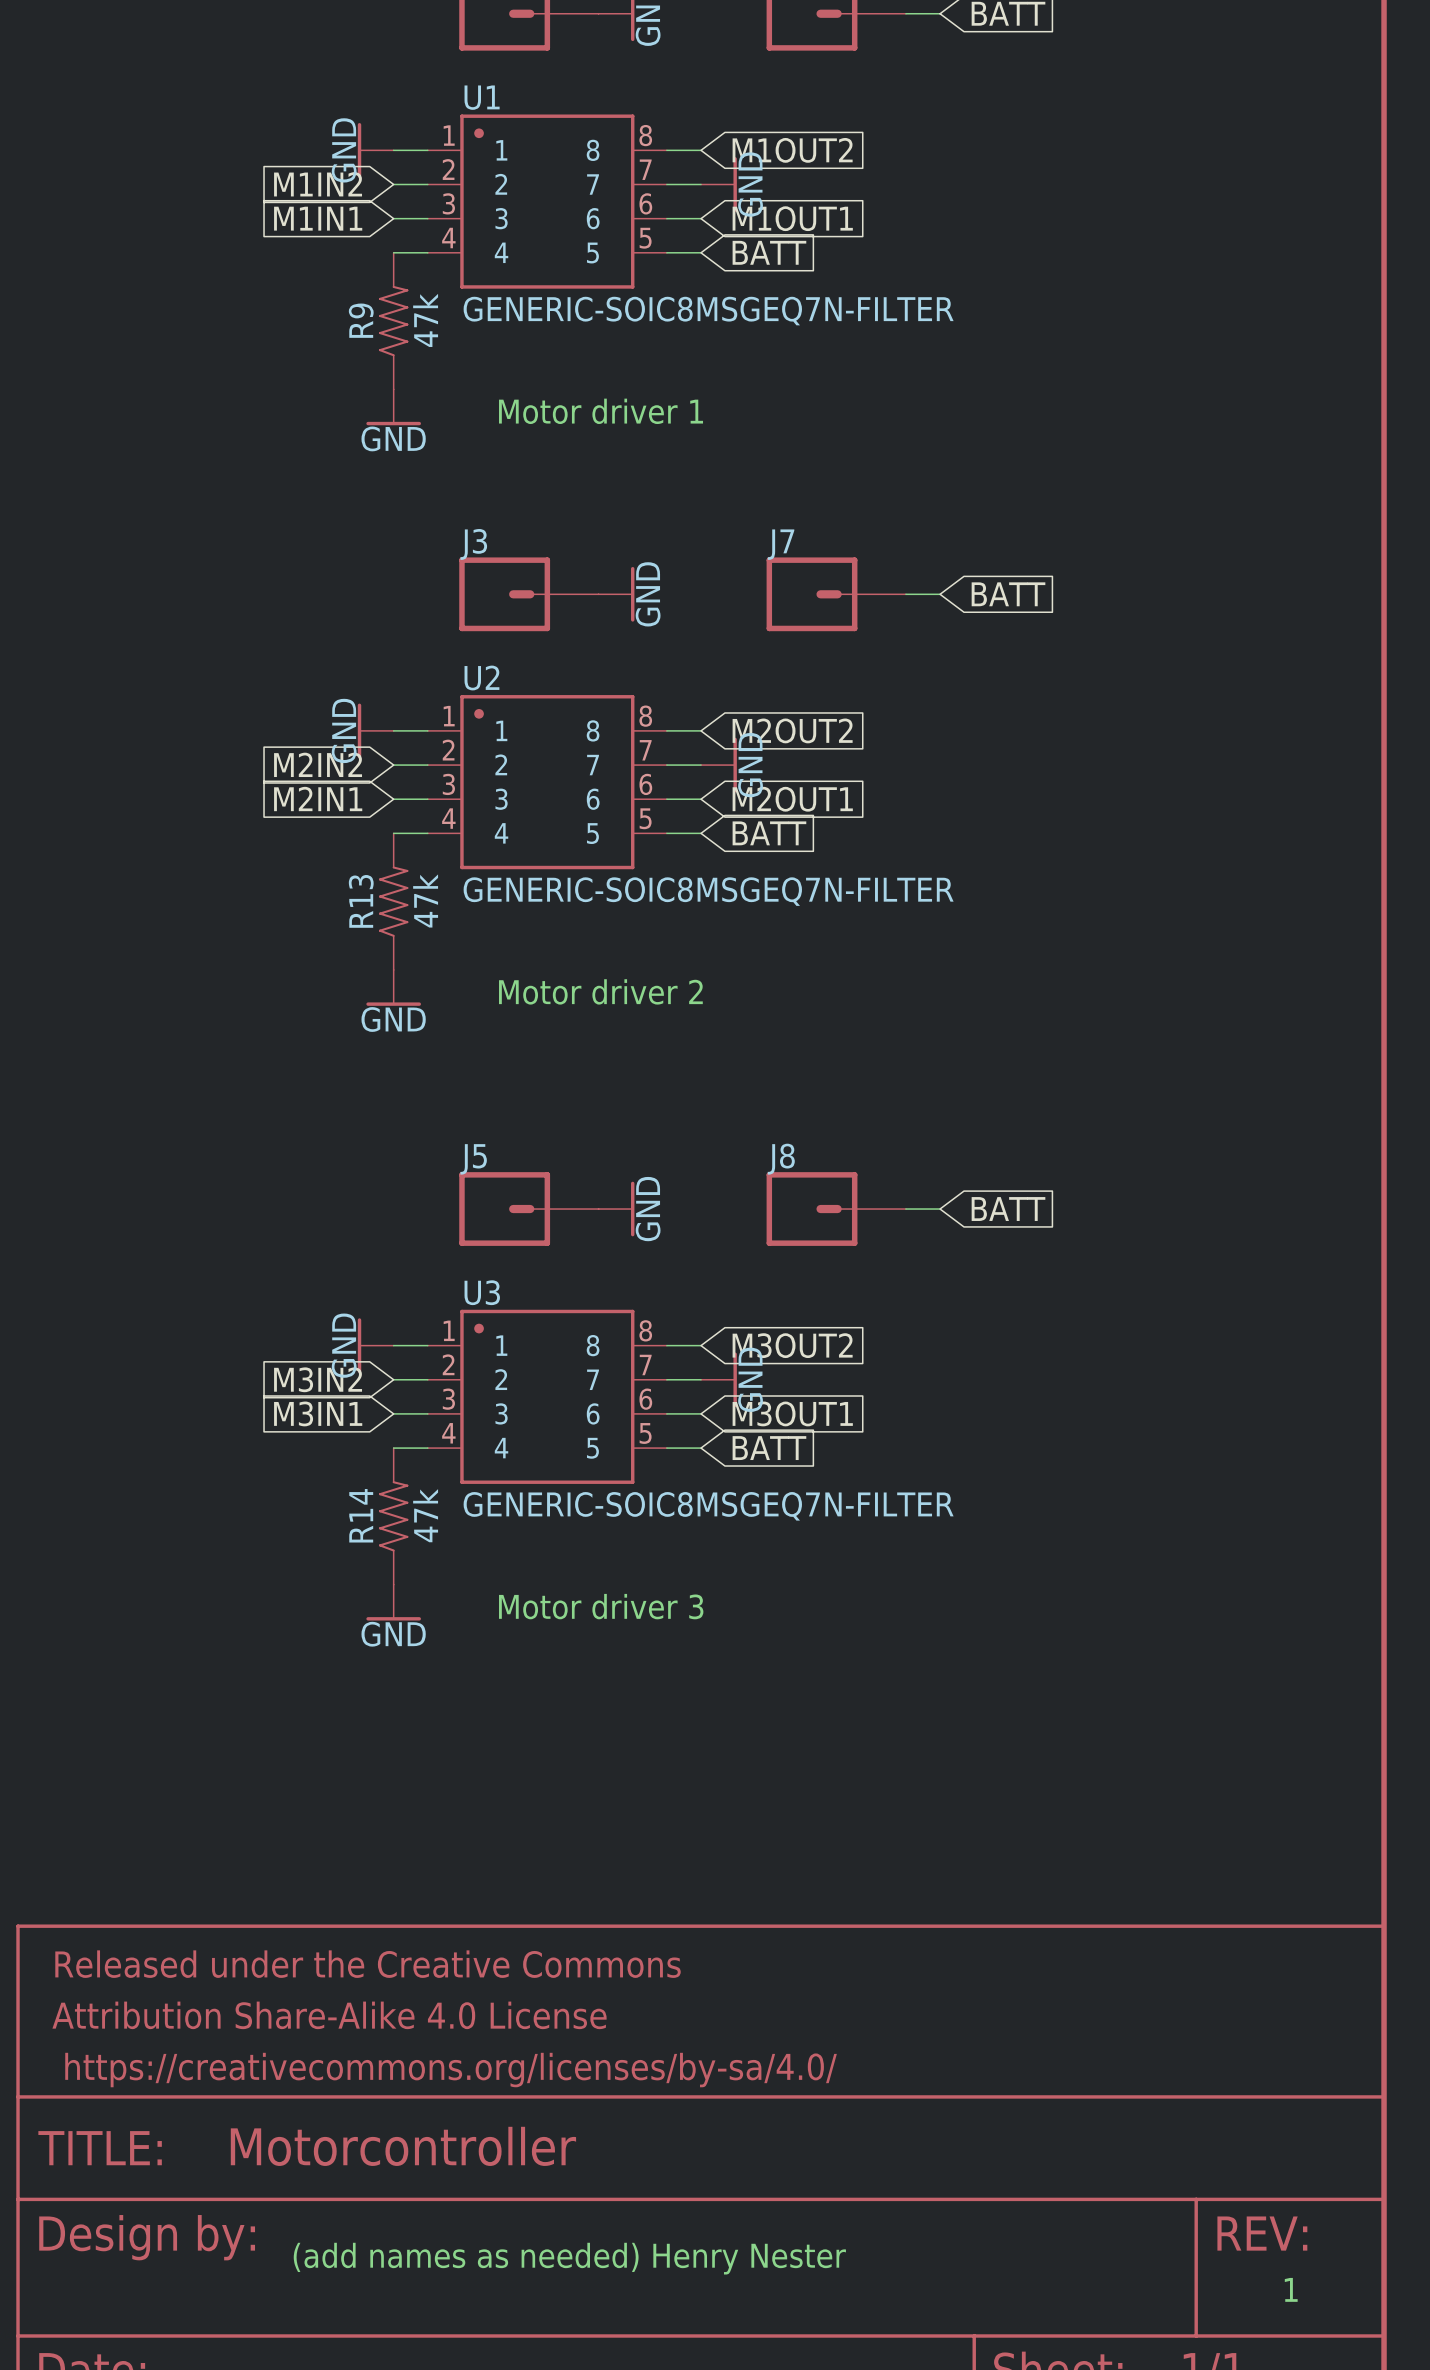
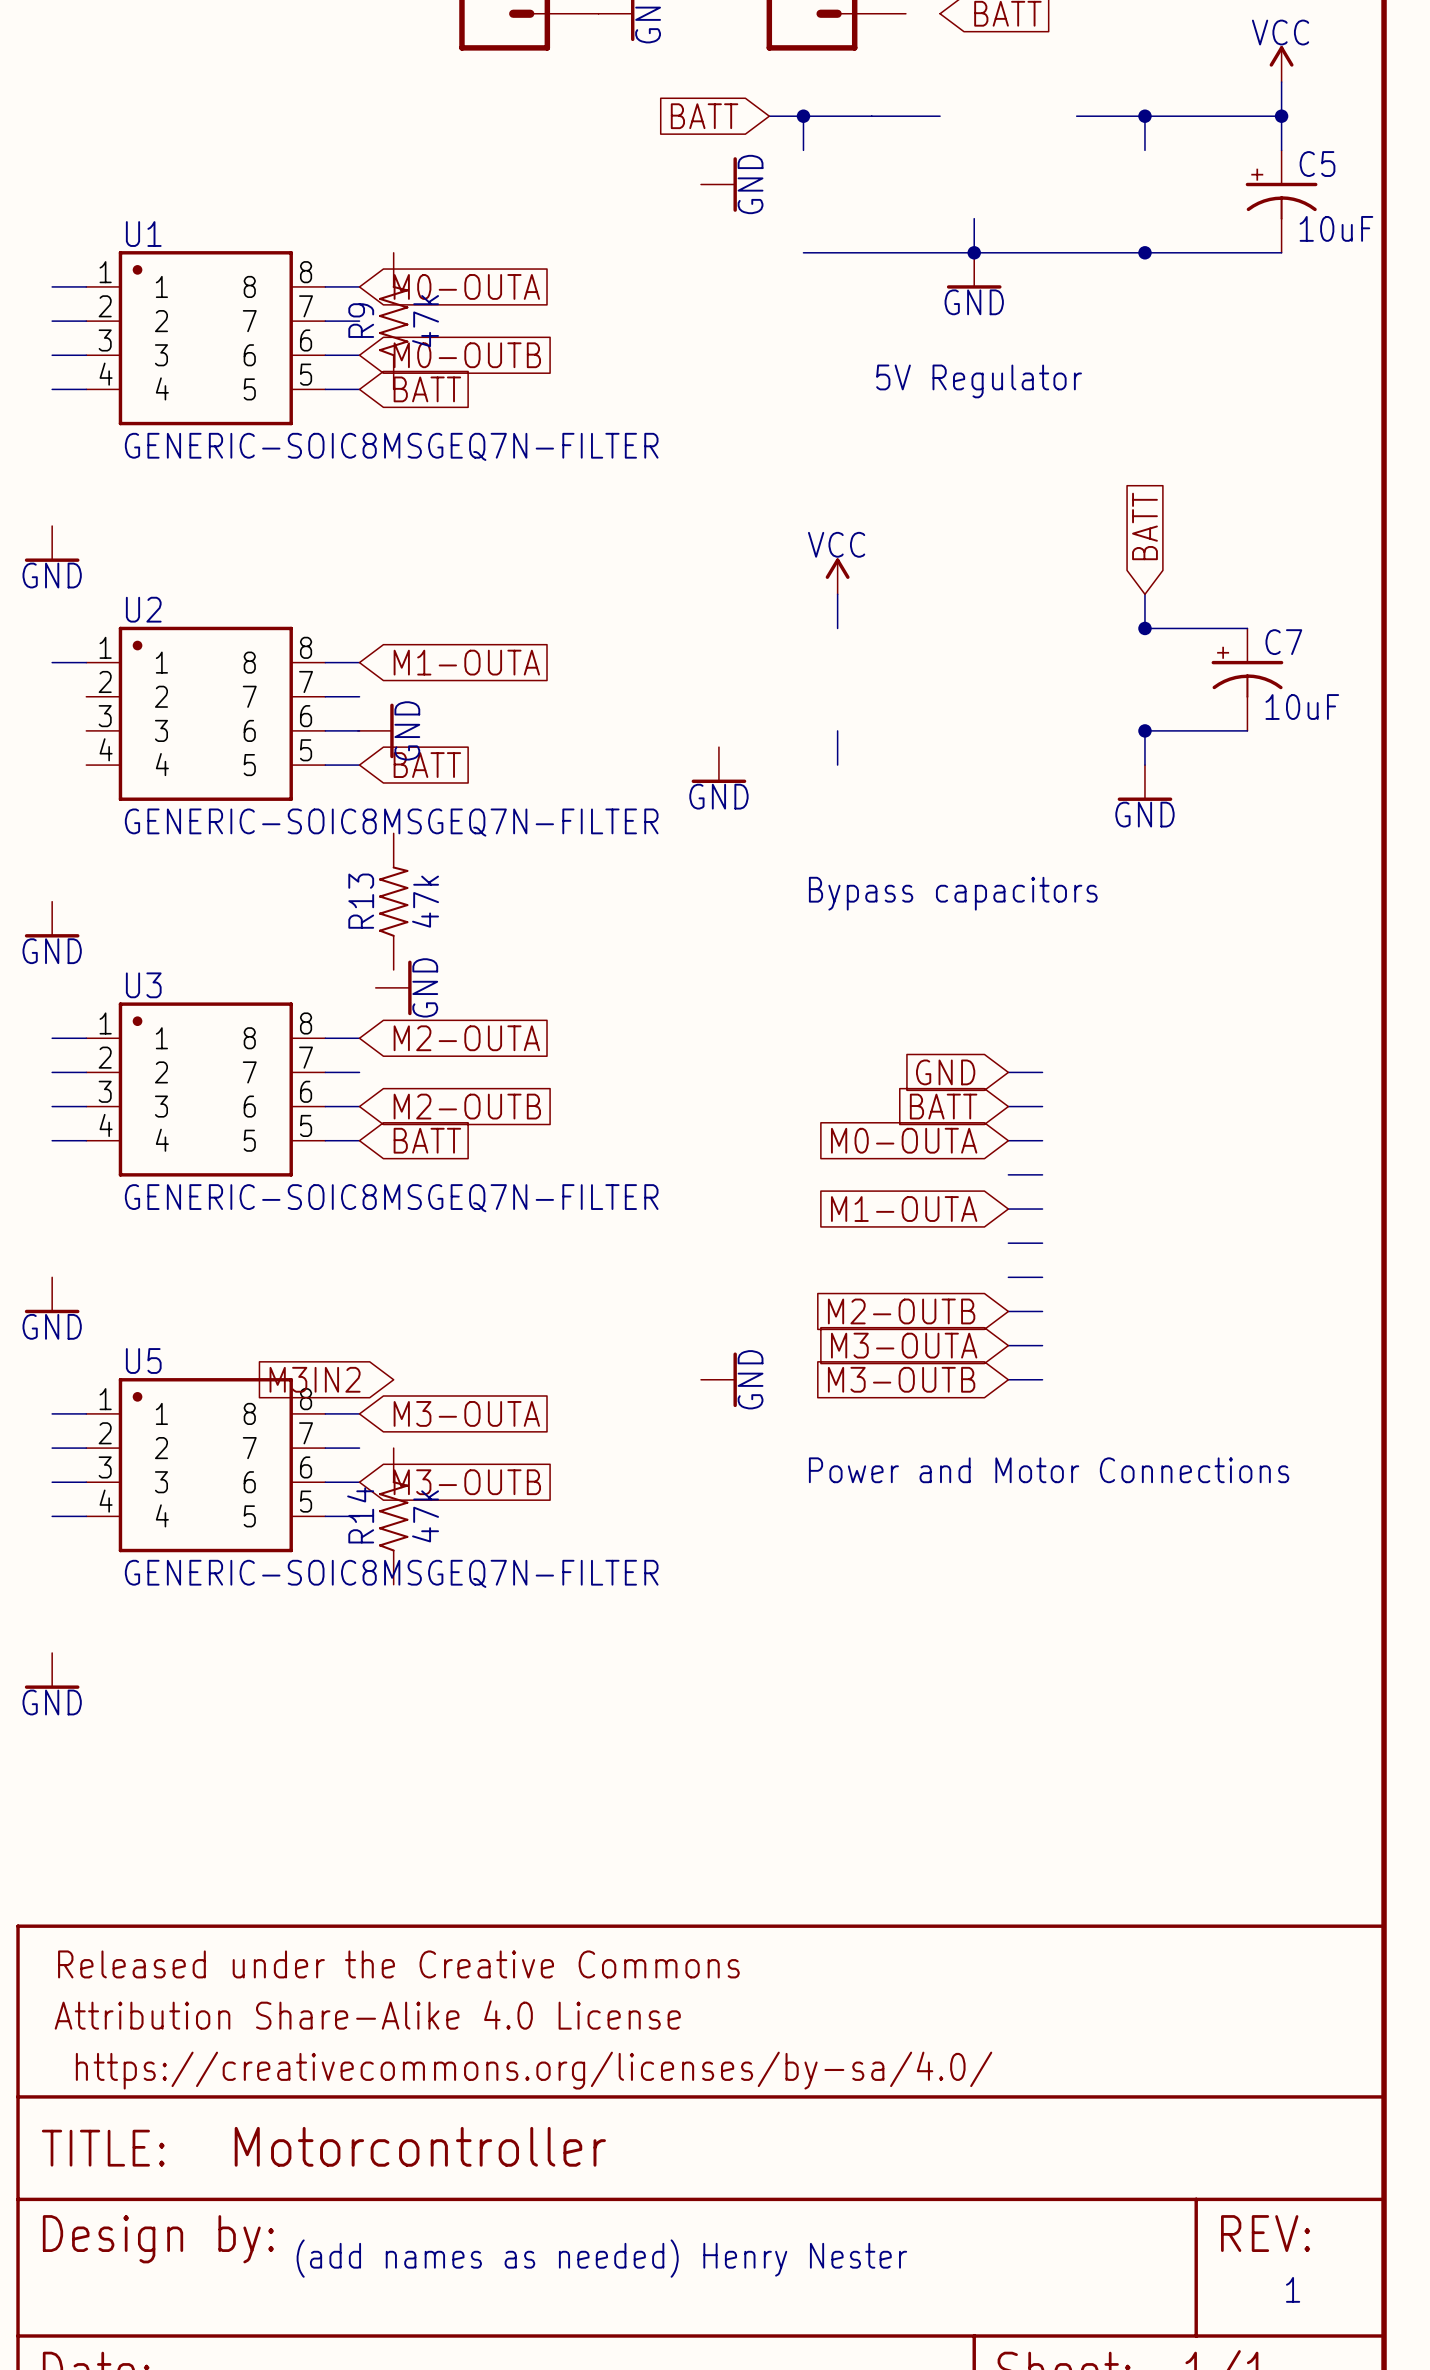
wire: (905, 13) (940, 13) -> none
power symbol: none -> VCC (1281, 64)
wire: none -> (1281, 82) (1281, 150)
wire: none -> (769, 116) (940, 116)
wire: none -> (803, 116) (803, 150)
junction: none -> (803, 116)
wire: none -> (1076, 116) (1281, 116)
wire: none -> (1144, 116) (1144, 150)
junction: none -> (1144, 116)
junction: none -> (1281, 116)
power symbol: GND (375, 150) -> none
wire: (393, 150) (427, 150) -> (325, 389) (359, 389)
wire: (666, 150) (701, 150) -> none
global label: M1OUT2 (792, 150) -> none
global label: M1IN2 (318, 184) -> none
wire: (393, 184) (427, 184) -> (325, 355) (359, 355)
wire: (666, 184) (701, 184) -> none
U1 position: (547, 201) -> (205, 338)
C5: none -> 10uF (1281, 201)
global label: M1IN1 (318, 218) -> none
wire: (393, 218) (427, 218) -> (325, 286) (359, 286)
wire: (666, 218) (701, 218) -> none
global label: M1OUT1 (792, 218) -> none
wire: none -> (974, 218) (974, 252)
wire: (393, 252) (427, 252) -> (325, 321) (359, 321)
wire: (666, 252) (701, 252) -> none
global label rotation: 0° (769, 252) -> 180° (704, 116)
global label position: BATT (769, 252) -> BATT (704, 116)
wire: none -> (803, 252) (1281, 252)
junction: none -> (974, 252)
junction: none -> (1144, 252)
power symbol: none -> GND (974, 270)
wire: none -> (52, 286) (86, 286)
global label: none -> M0-OUTA (466, 286)
wire: none -> (52, 321) (86, 321)
wire: none -> (52, 355) (86, 355)
global label: none -> M0-OUTB (467, 355)
text: none -> 5V Regulator (979, 381)
wire: none -> (52, 389) (86, 389)
global label: none -> BATT (427, 389)
power symbol: GND (393, 407) -> none
text: Motor driver 1 (601, 411) -> none
power symbol: none -> GND (52, 543)
power symbol: none -> VCC (837, 576)
J3: (528, 594) -> none
power symbol: GND (616, 594) -> none
J7: (836, 594) -> none
wire: none -> (837, 594) (837, 628)
wire: (905, 594) (940, 594) -> none
global label rotation: 0° (1008, 594) -> 90° counterclockwise (1144, 526)
global label position: BATT (1008, 594) -> BATT (1144, 526)
wire: none -> (1144, 594) (1144, 628) (1247, 628)
junction: none -> (1144, 628)
wire: none -> (52, 662) (86, 662)
wire: none -> (325, 662) (359, 662)
global label: none -> M1-OUTA (466, 662)
C7: none -> 10uF (1247, 679)
wire: none -> (325, 696) (359, 696)
power symbol rotation: 0° (359, 730) -> 180° (391, 730)
wire: (393, 730) (427, 730) -> (325, 765) (359, 765)
wire: (666, 730) (701, 730) -> none
global label: M2OUT2 (792, 730) -> none
wire: none -> (837, 730) (837, 765)
junction: none -> (1144, 730)
wire: none -> (1247, 730) (1144, 730) (1144, 765)
global label: M2IN2 (318, 764) -> none
wire: (393, 765) (427, 765) -> (325, 730) (359, 730)
global label: none -> BATT (427, 765)
wire: (666, 765) (701, 765) -> none
power symbol rotation: 0° (735, 765) -> 90° clockwise (718, 781)
U2 position: (547, 782) -> (205, 713)
power symbol: none -> GND (1144, 782)
global label: M2IN1 (318, 799) -> none
wire: (393, 799) (427, 799) -> (325, 1106) (359, 1106)
wire: (666, 799) (701, 799) -> none
global label: M2OUT1 (792, 799) -> none
wire: (393, 833) (427, 833) -> (325, 1140) (359, 1140)
wire: (666, 833) (701, 833) -> none
global label: BATT (769, 833) -> none
text: none -> Bypass capacitors (953, 893)
power symbol: none -> GND (52, 919)
text: Motor driver 2 (600, 991) -> none
power symbol rotation: 0° (393, 1004) -> 90° counterclockwise (409, 987)
wire: none -> (52, 1038) (86, 1038)
wire: none -> (325, 1038) (359, 1038)
global label: none -> M2-OUTA (466, 1038)
wire: none -> (52, 1072) (86, 1072)
wire: none -> (325, 1072) (359, 1072)
global label: none -> GND (945, 1072)
wire: none -> (1008, 1072) (1042, 1072)
wire: none -> (52, 1106) (86, 1106)
global label: none -> M2-OUTB (467, 1106)
wire: none -> (1008, 1106) (1042, 1106)
wire: none -> (52, 1140) (86, 1140)
global label: none -> BATT (427, 1140)
global label: none -> M0-OUTA (904, 1140)
wire: none -> (1008, 1140) (1042, 1140)
wire: none -> (1008, 1174) (1042, 1174)
J5: (528, 1209) -> none
power symbol: GND (616, 1209) -> none
J8: (836, 1209) -> none
wire: (905, 1209) (940, 1209) -> (1008, 1209) (1042, 1209)
global label: none -> M1-OUTA (904, 1209)
global label rotation: 0° (1008, 1209) -> 180° (943, 1106)
wire: none -> (1008, 1243) (1042, 1243)
wire: none -> (1008, 1277) (1042, 1277)
power symbol: none -> GND (52, 1295)
global label: none -> M2-OUTB (901, 1311)
wire: none -> (1008, 1311) (1042, 1311)
power symbol: GND (375, 1345) -> none
wire: (393, 1345) (427, 1345) -> (325, 1413) (359, 1413)
wire: (666, 1345) (701, 1345) -> none
global label: M3OUT2 (792, 1345) -> none
global label: none -> M3-OUTA (904, 1345)
wire: none -> (1008, 1345) (1042, 1345)
wire: (393, 1379) (427, 1379) -> (325, 1448) (359, 1448)
wire: (666, 1379) (701, 1379) -> none
global label: none -> M3-OUTB (901, 1379)
wire: none -> (1008, 1379) (1042, 1379)
U3 position: (547, 1396) -> (205, 1089)
wire: none -> (52, 1413) (86, 1413)
global label: M3IN1 (318, 1413) -> none
wire: (393, 1413) (427, 1413) -> (325, 1482) (359, 1482)
global label: none -> M3-OUTA (466, 1413)
wire: (666, 1413) (701, 1413) -> none
global label: M3OUT1 (792, 1413) -> none
wire: none -> (52, 1448) (86, 1448)
wire: (393, 1448) (427, 1448) -> (325, 1516) (359, 1516)
wire: (666, 1448) (701, 1448) -> none
global label: BATT (769, 1448) -> none
U5: none -> GENERIC-SOIC8MSGEQ7N-FILTER (205, 1465)
text: none -> Power and Motor Connections (1049, 1470)
wire: none -> (52, 1482) (86, 1482)
global label: none -> M3-OUTB (467, 1482)
wire: none -> (52, 1516) (86, 1516)
power symbol: GND (393, 1602) -> none
text: Motor driver 3 (601, 1606) -> none
power symbol: none -> GND (52, 1670)

